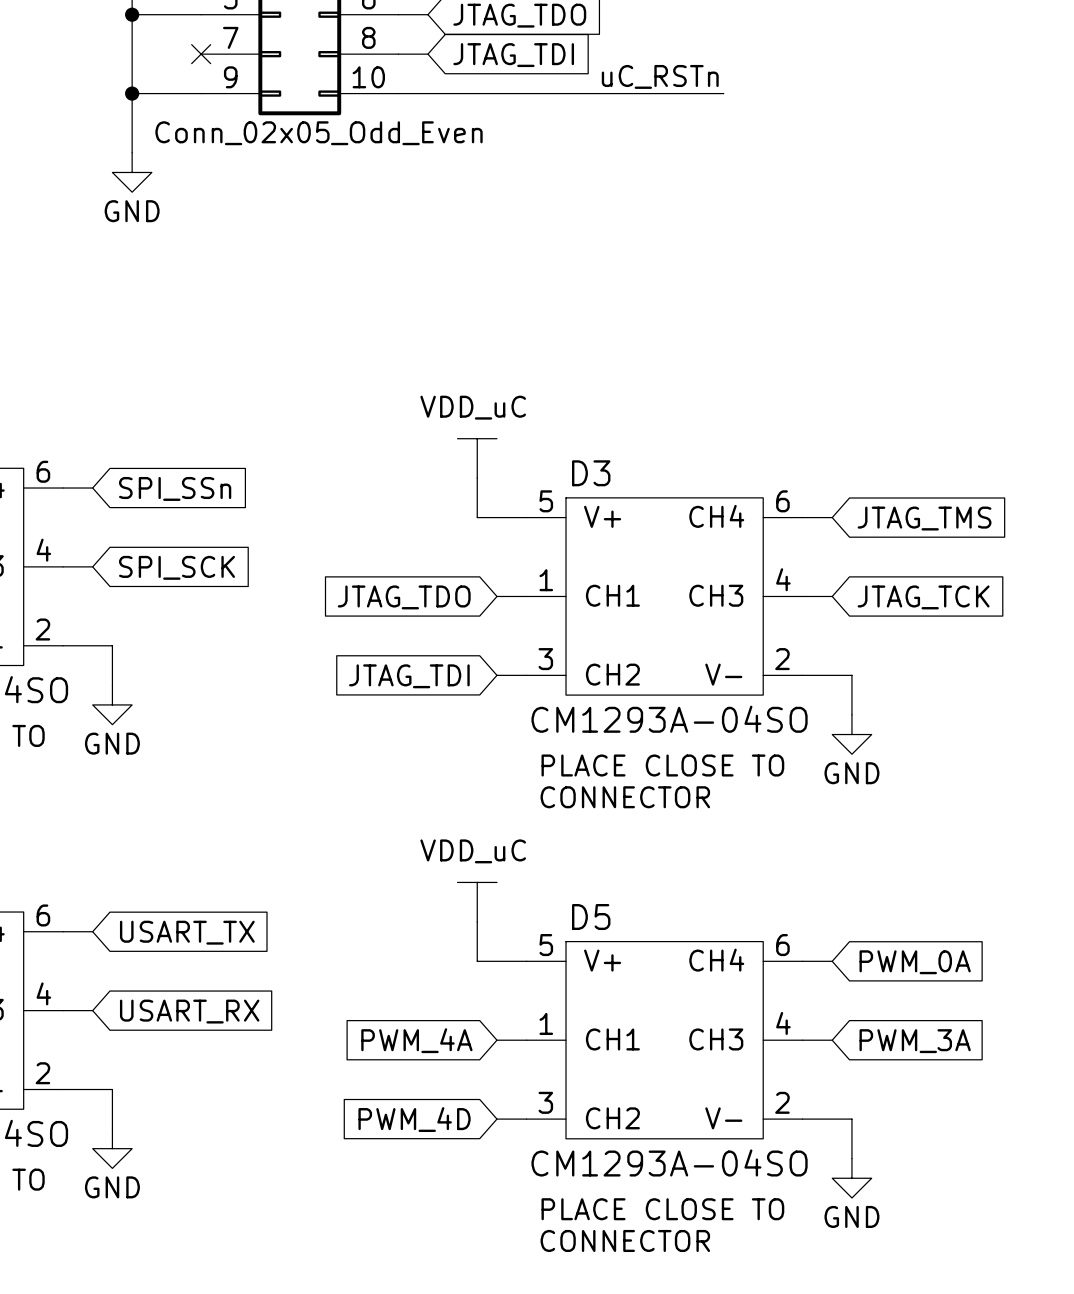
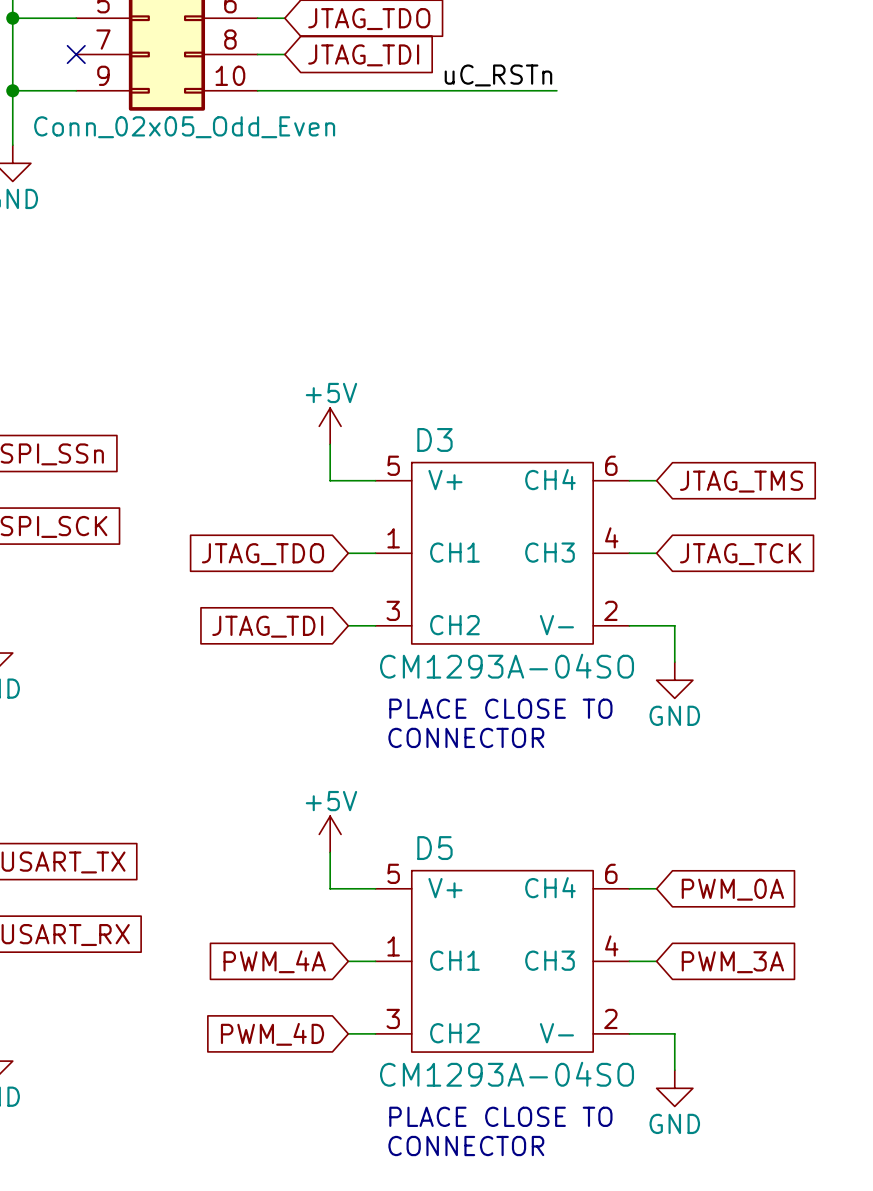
power symbol: VDD_uC (477, 458) -> +5V (330, 426)
power symbol: VDD_uC (477, 902) -> +5V (330, 834)

